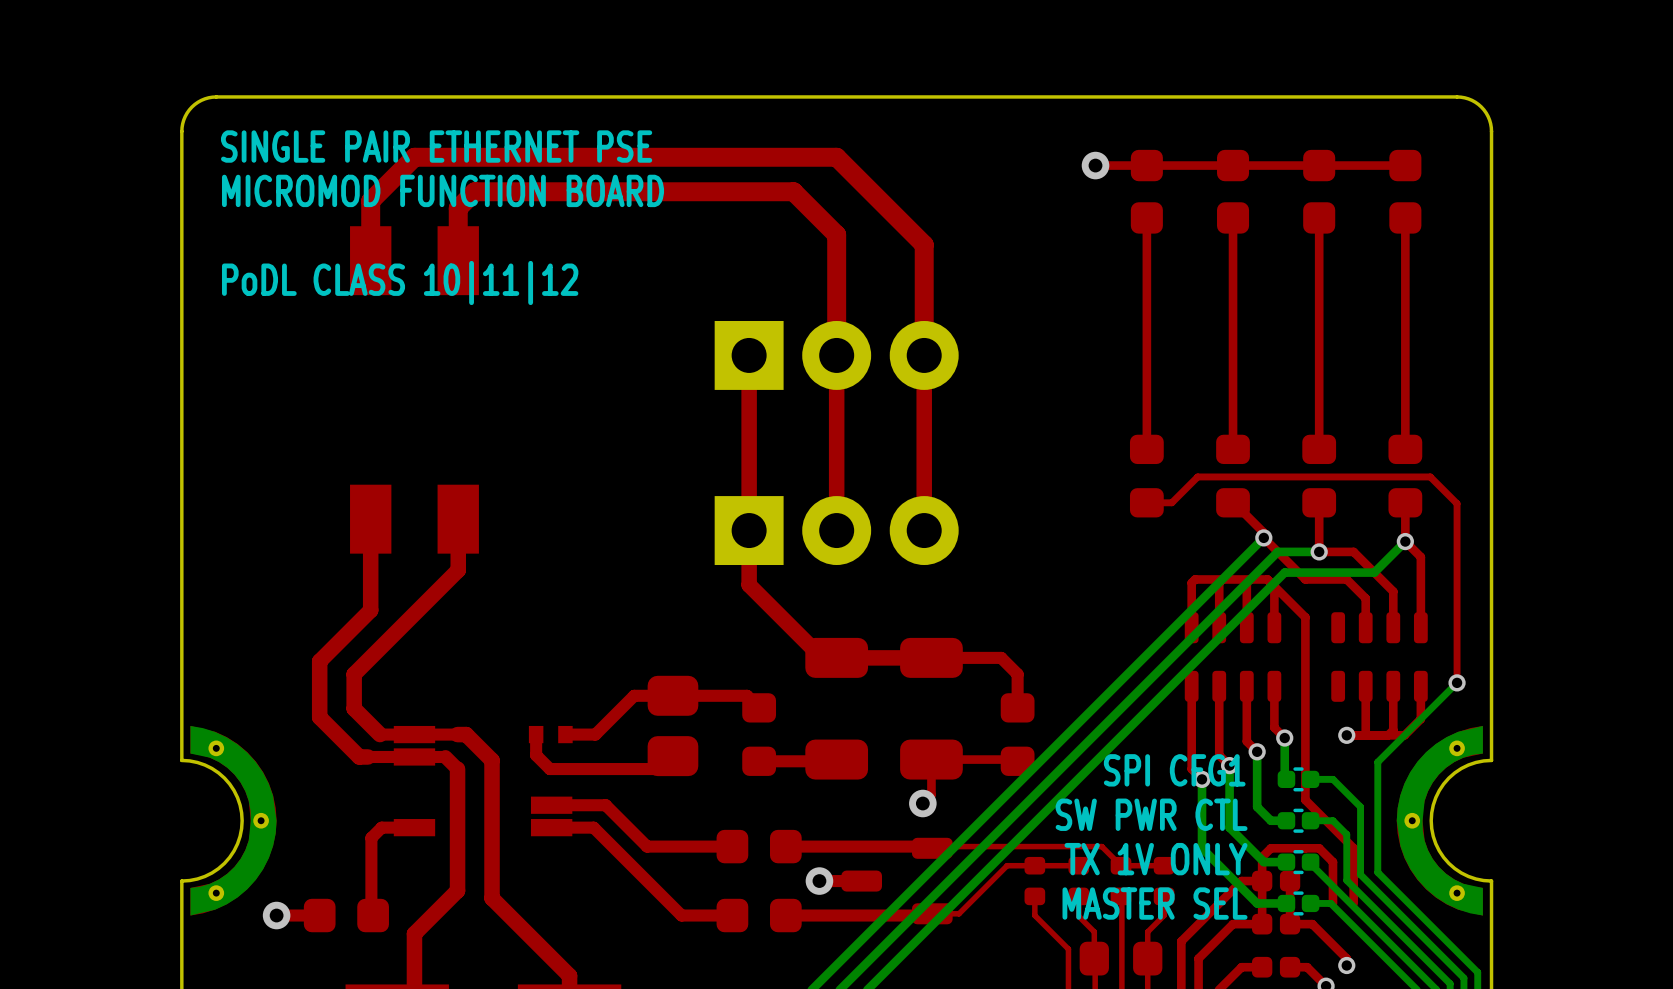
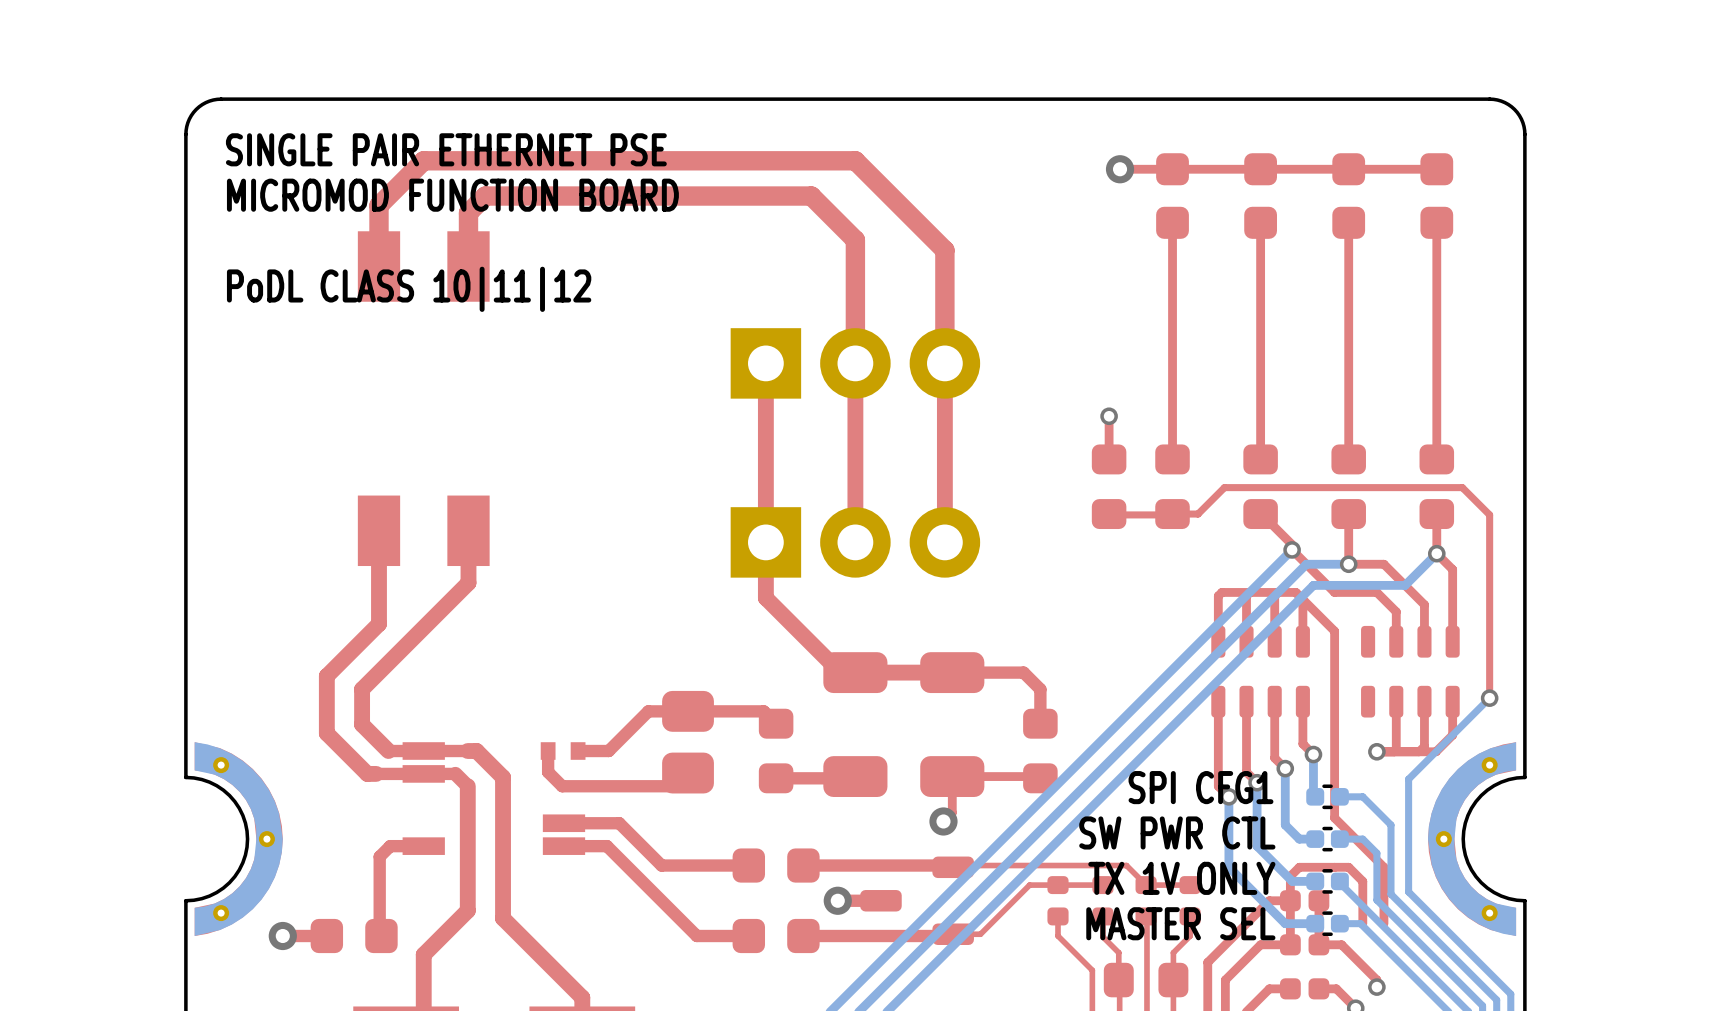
top track: none -> (1109, 416) (1109, 459)
via: none -> (1109, 416)
part: none -> (1109, 486)
top track: none -> (1109, 514) (1158, 514)

